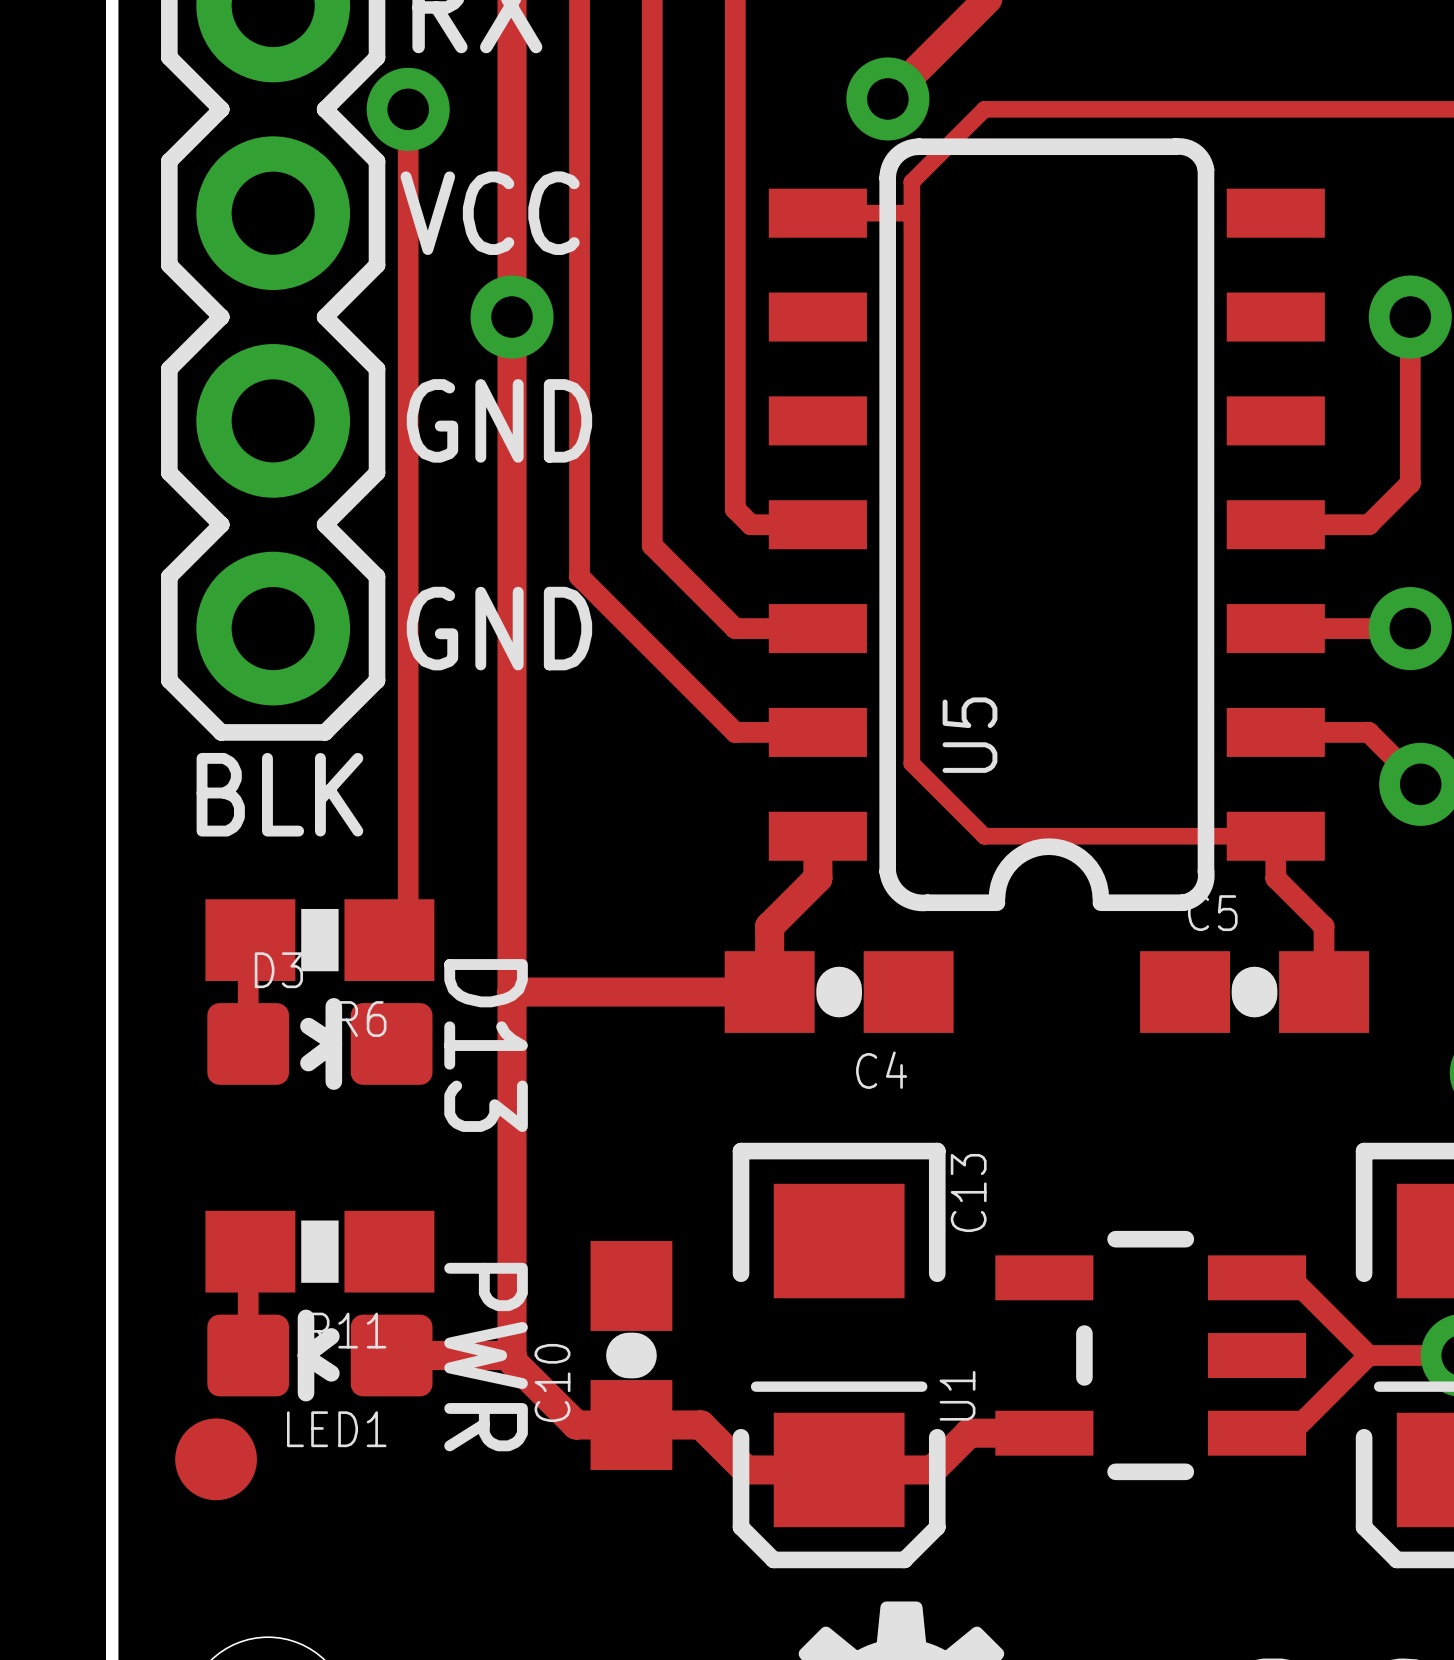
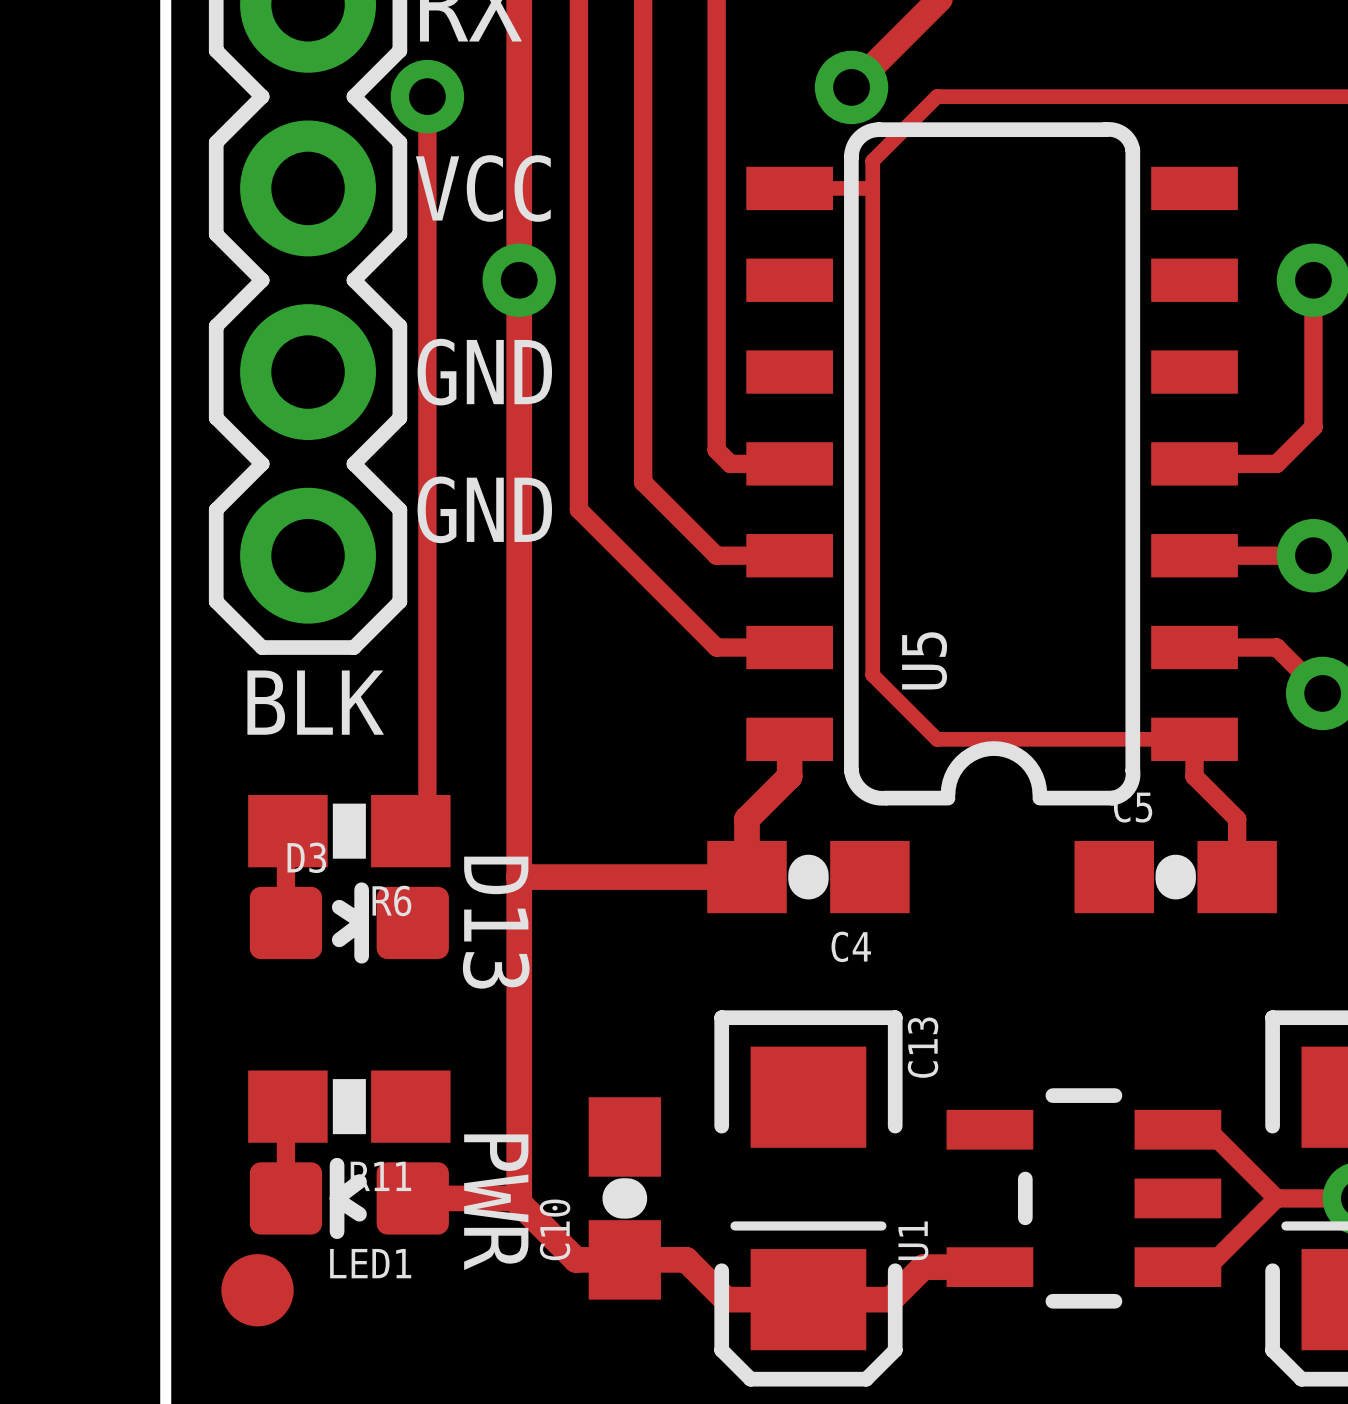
text position: GND (499, 628) -> GND (484, 509)

